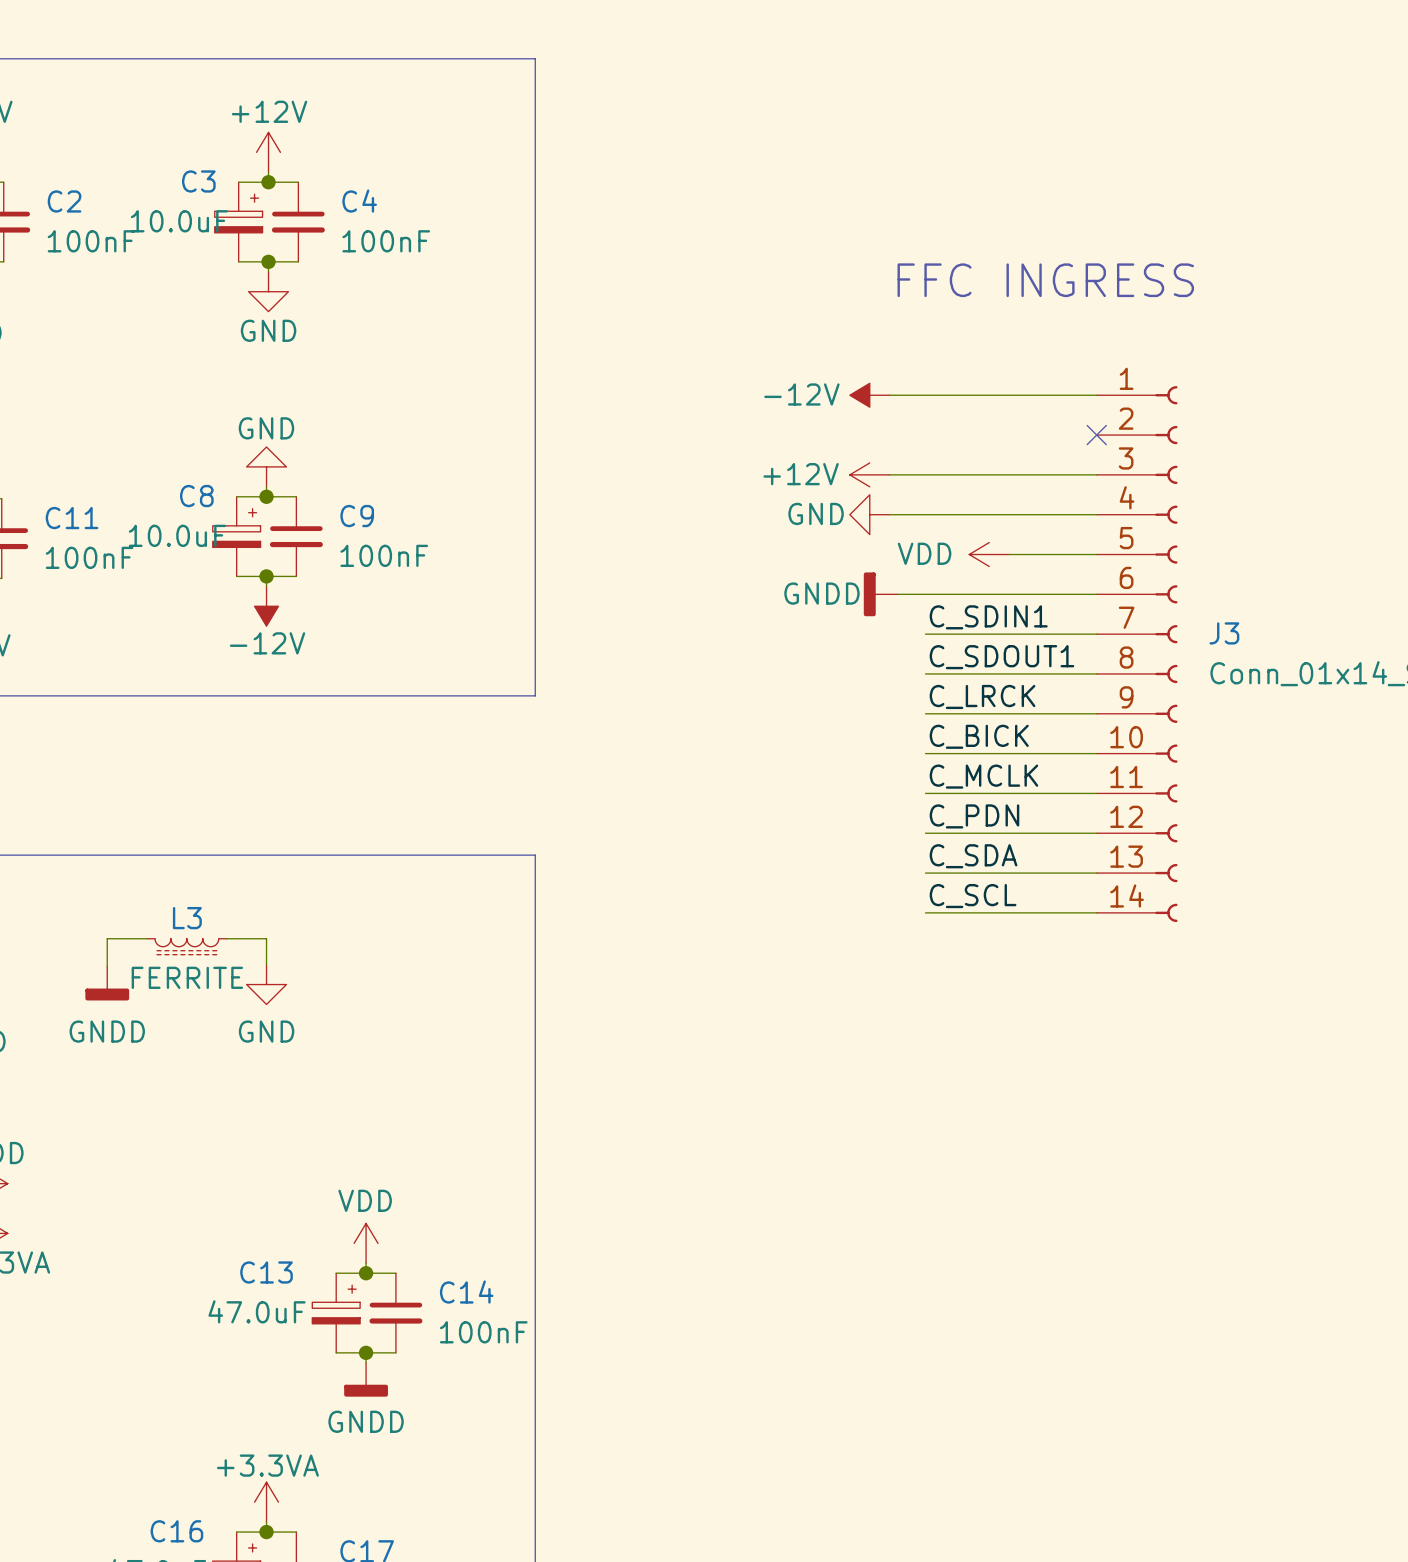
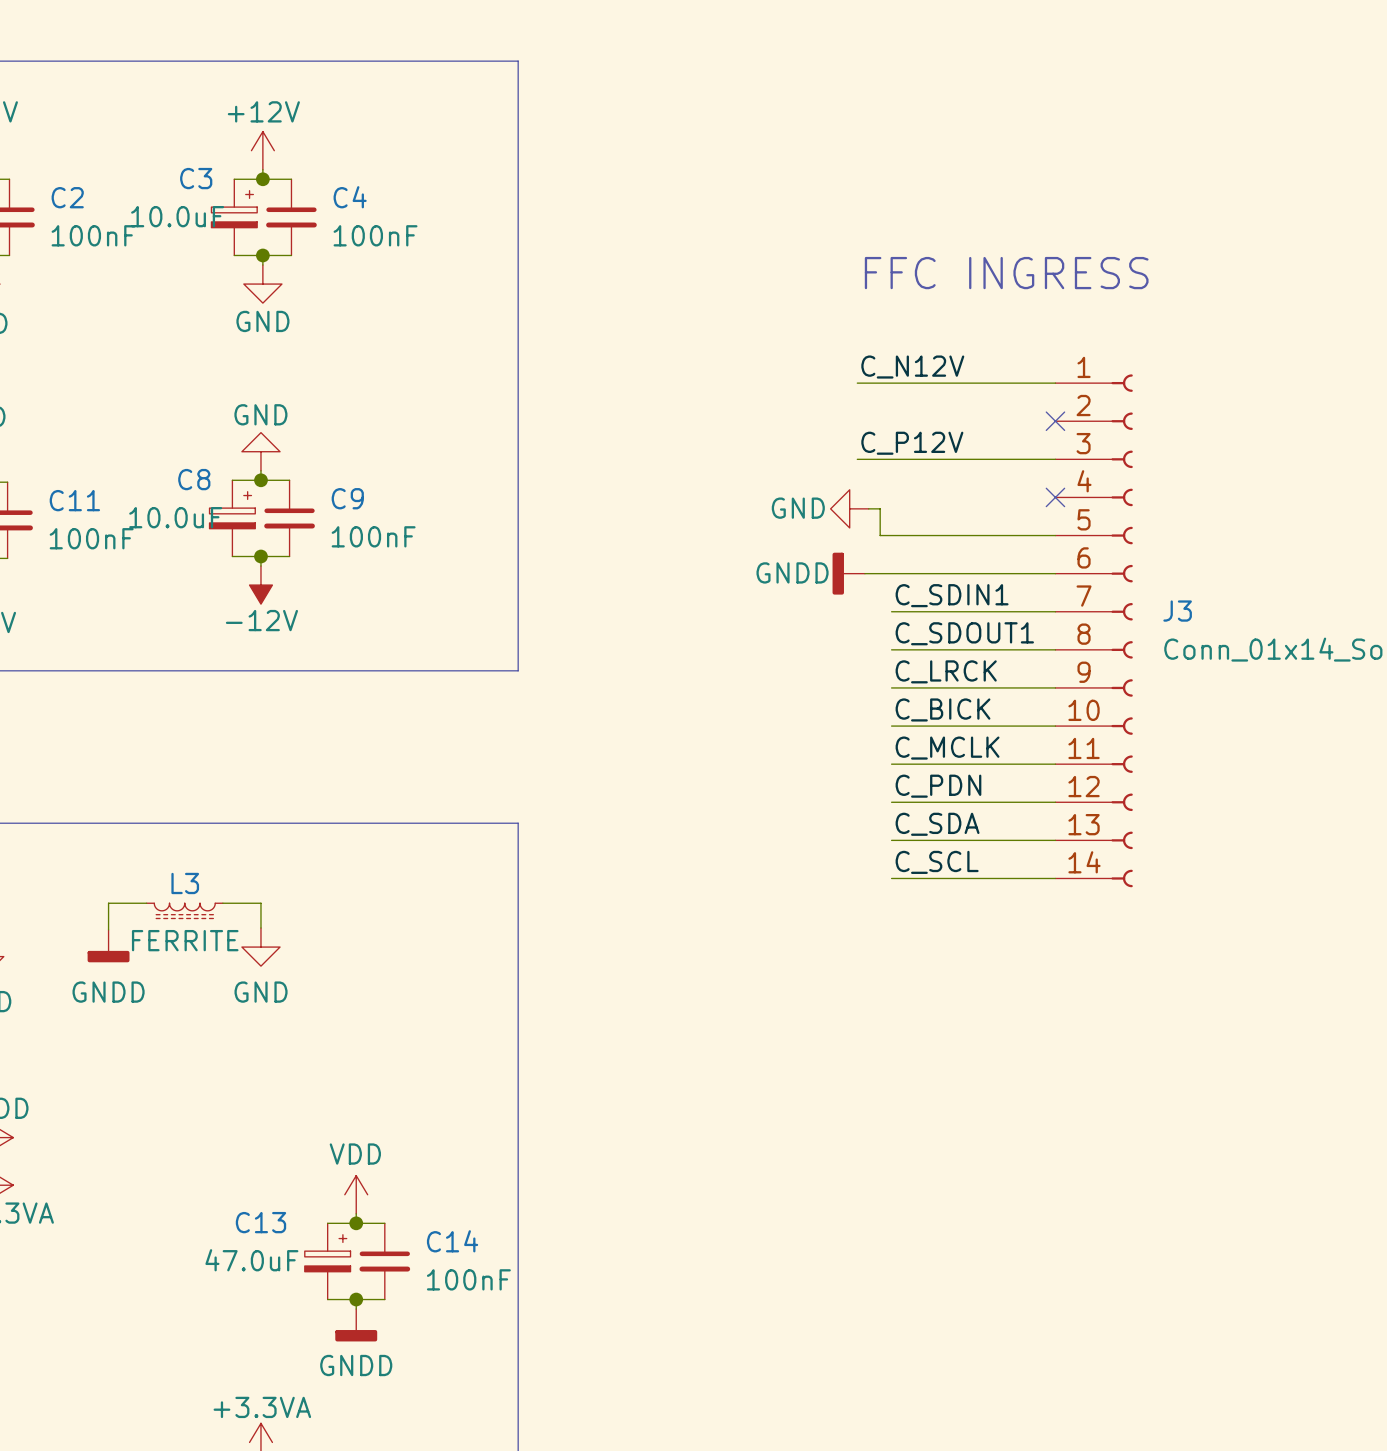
label: none -> C_N12V (912, 367)
power symbol: -12V (869, 395) -> none
label: none -> C_P12V (912, 443)
power symbol: +12V (869, 474) -> none
power symbol position: GND (869, 514) -> GND (849, 508)
wire: (889, 514) (1096, 514) -> none
no-connect mark: none -> (1055, 497)
wire: none -> (868, 508) (880, 508) (880, 535) (971, 535)
power symbol: VDD (989, 554) -> none

